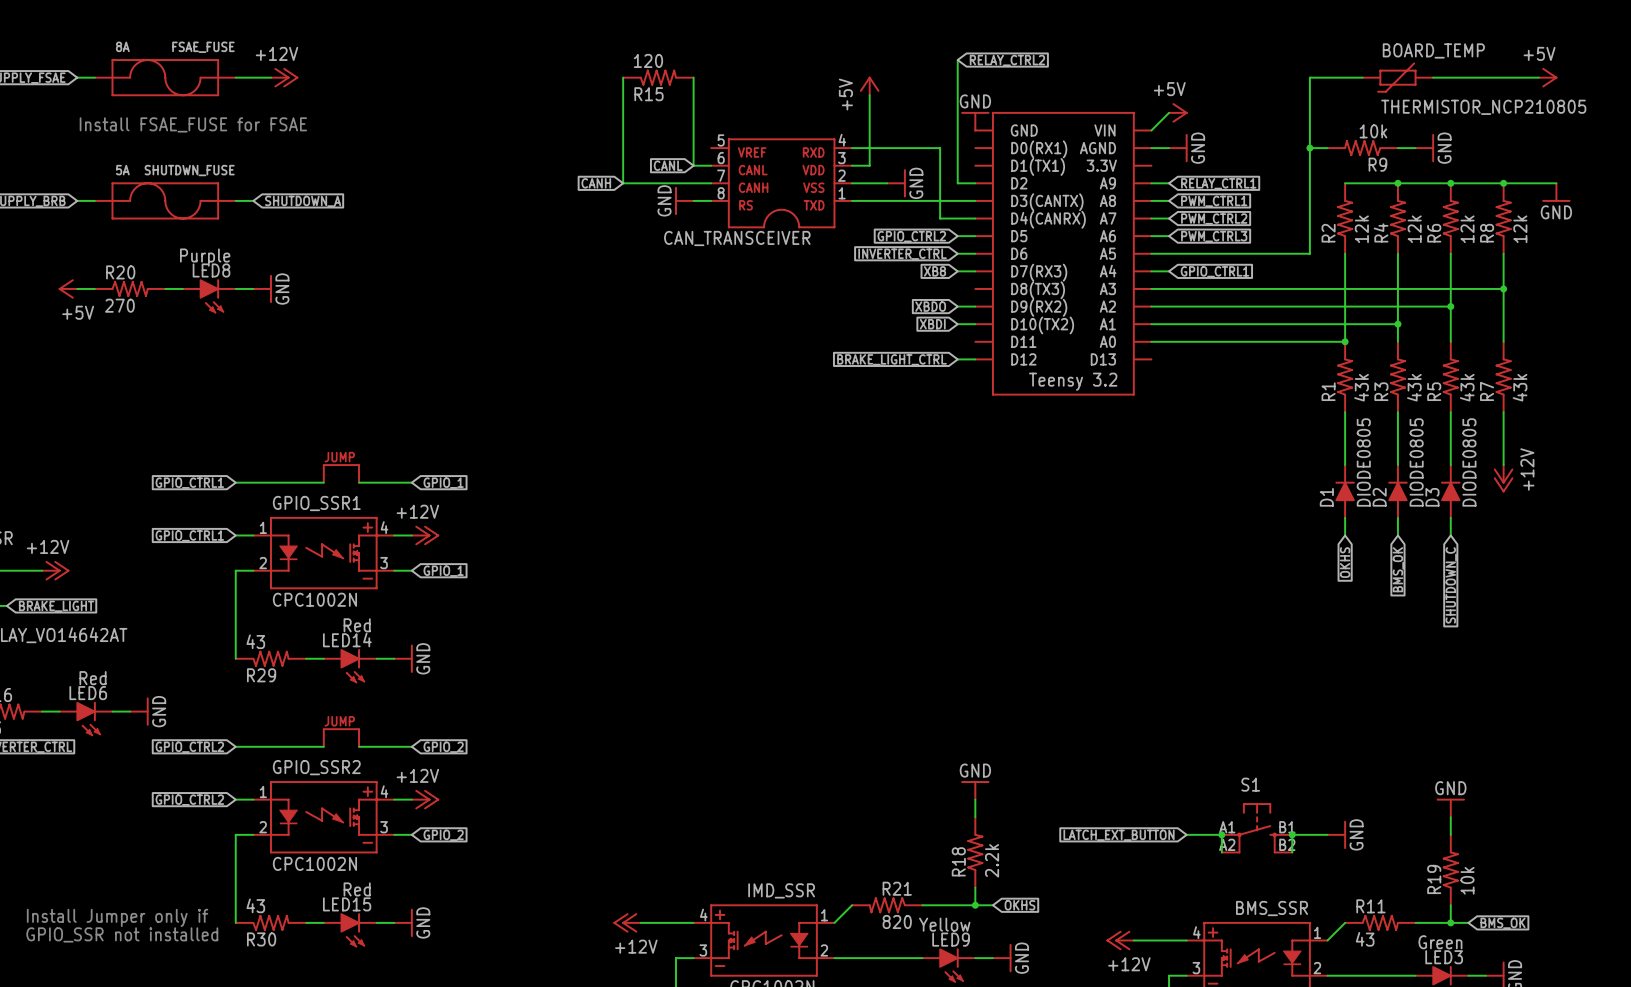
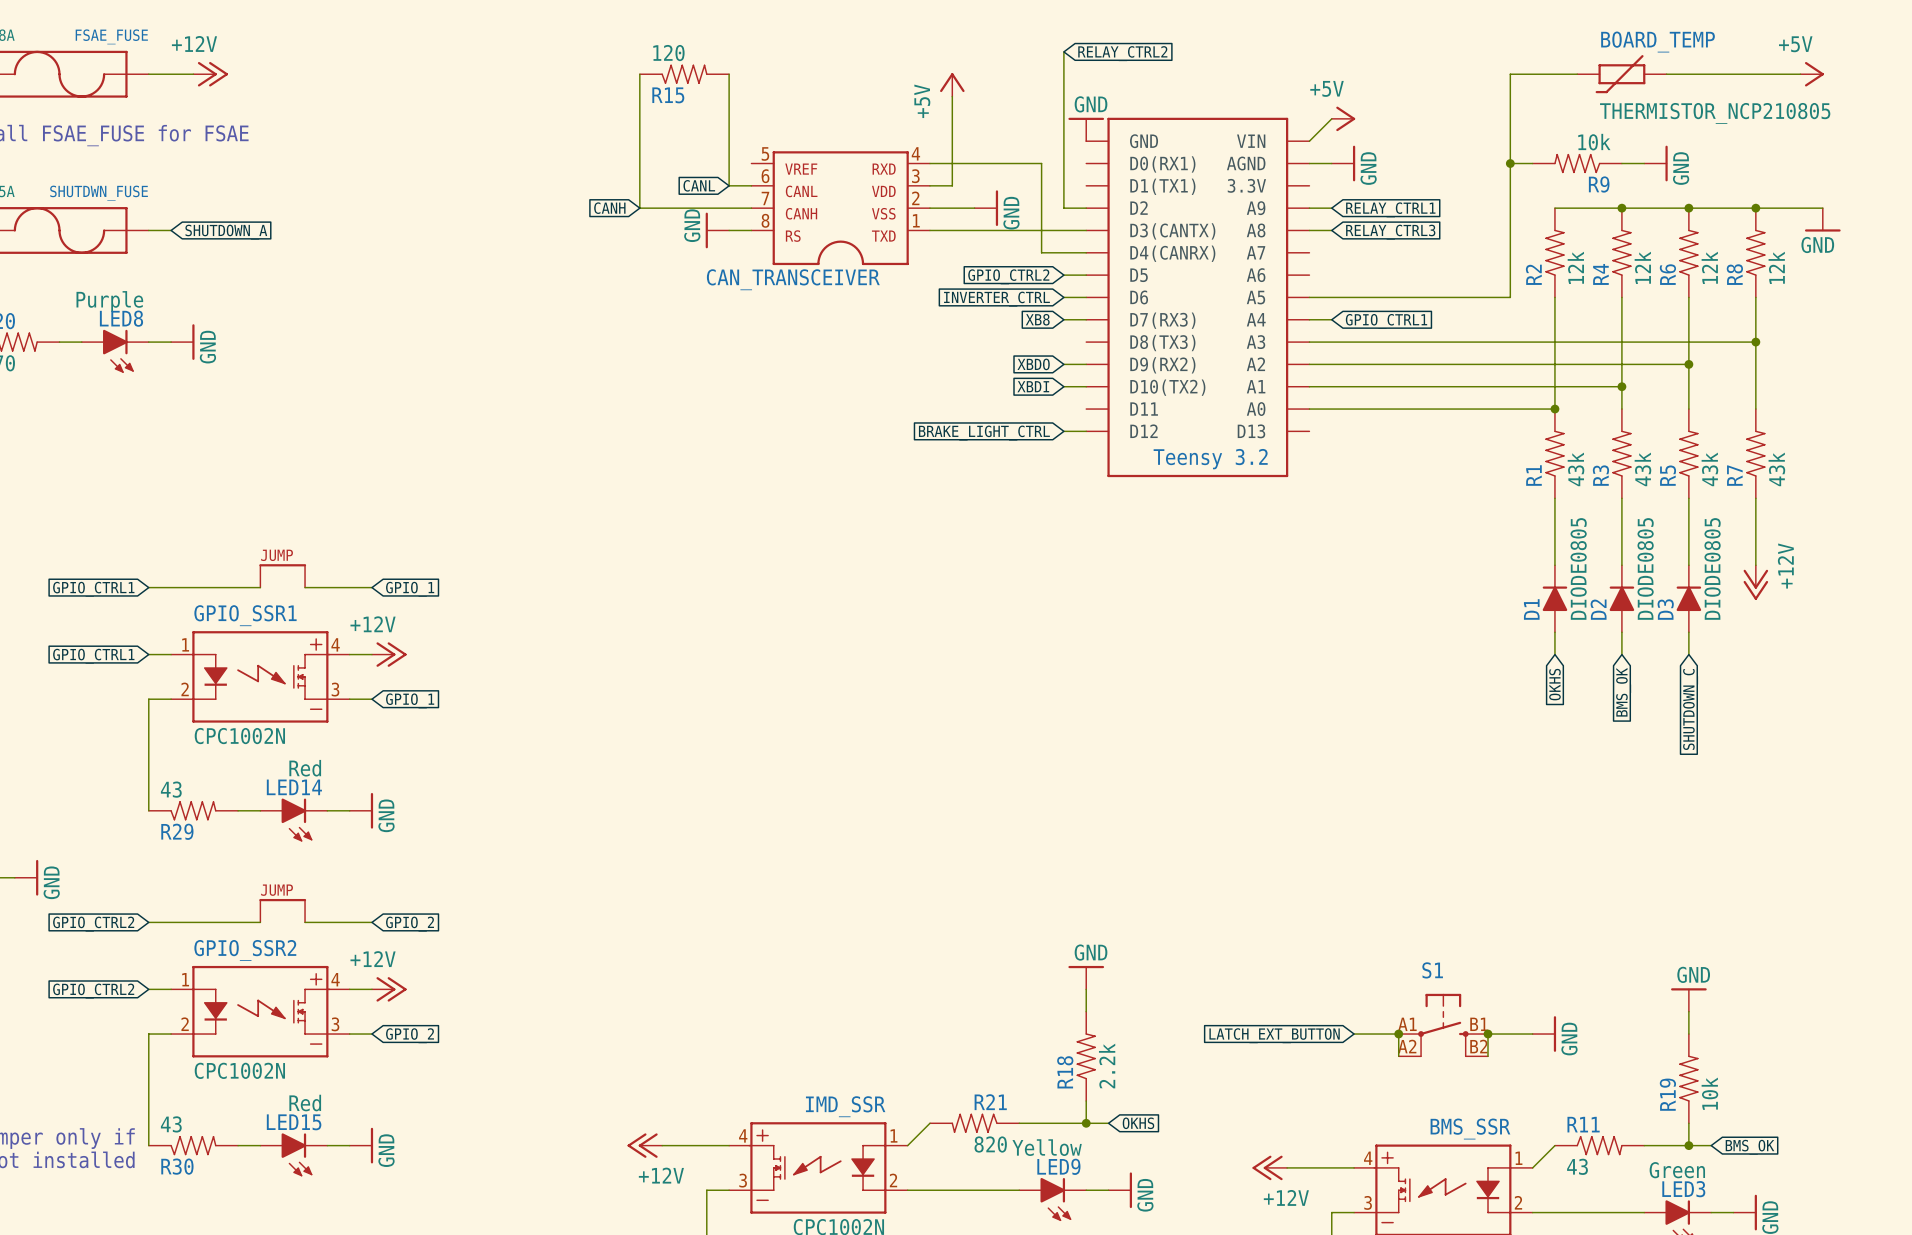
global label: PWM_CTRL1 (1214, 201) -> RELAY_CTRL3 (1390, 232)
wire: (1151, 218) (1169, 218) -> none
global label: PWM_CTRL2 (1214, 218) -> none
wire: (1151, 236) (1169, 236) -> none
global label: PWM_CTRL3 (1214, 236) -> none

